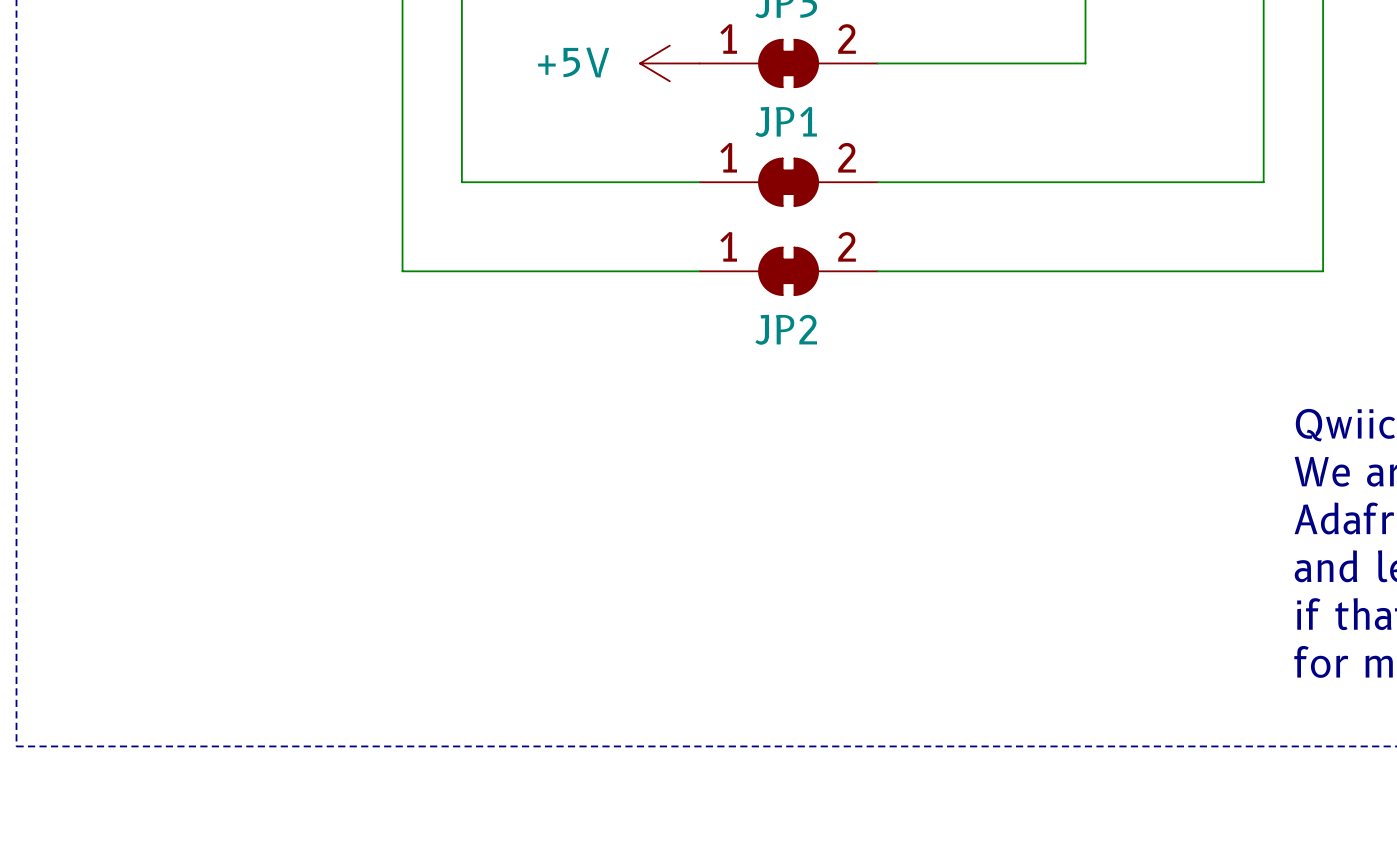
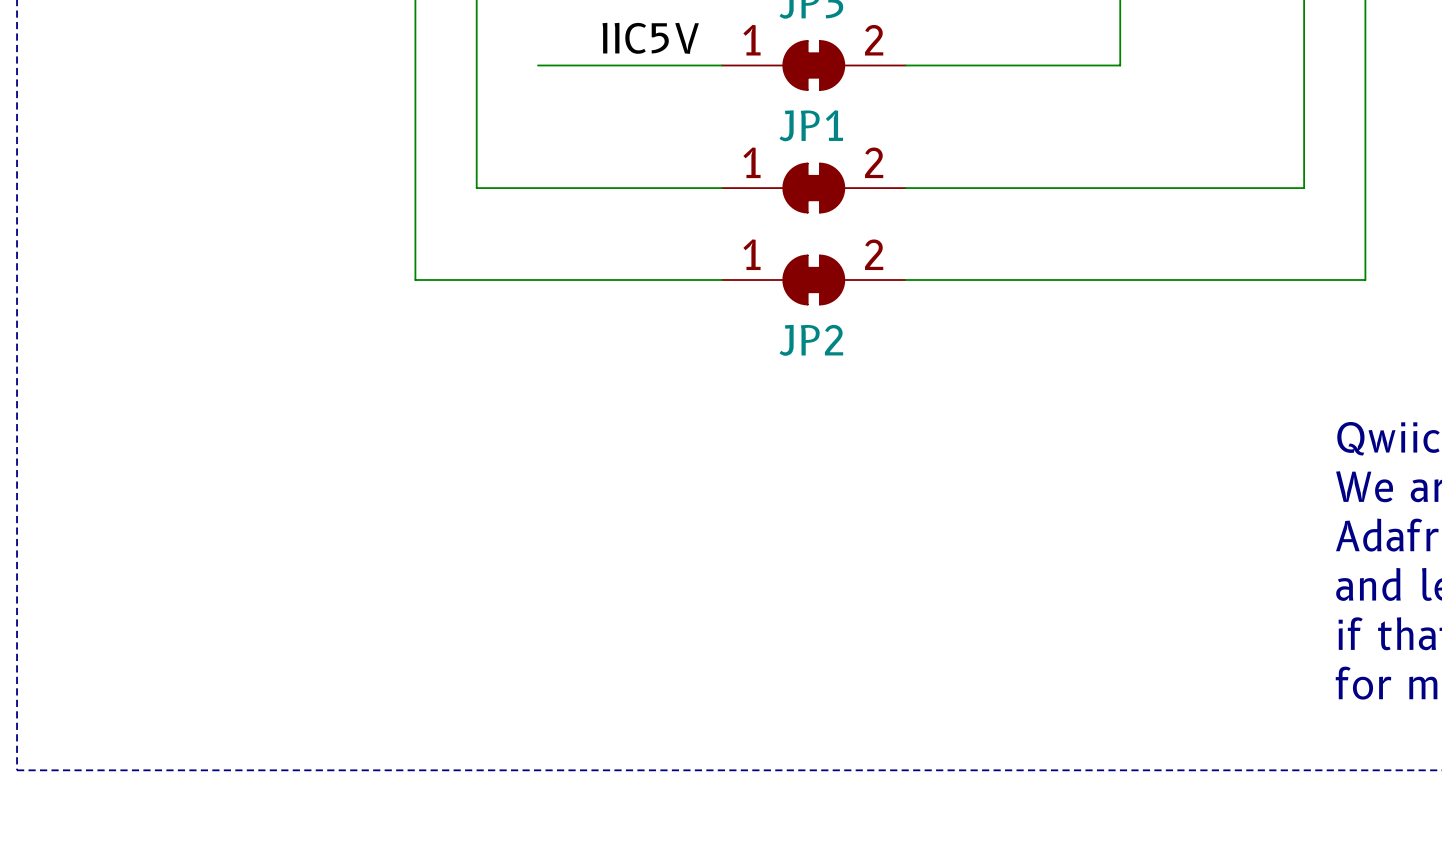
label: none -> IIC5V (650, 38)
wire: none -> (537, 65) (721, 65)
power symbol: +5V (669, 63) -> none

